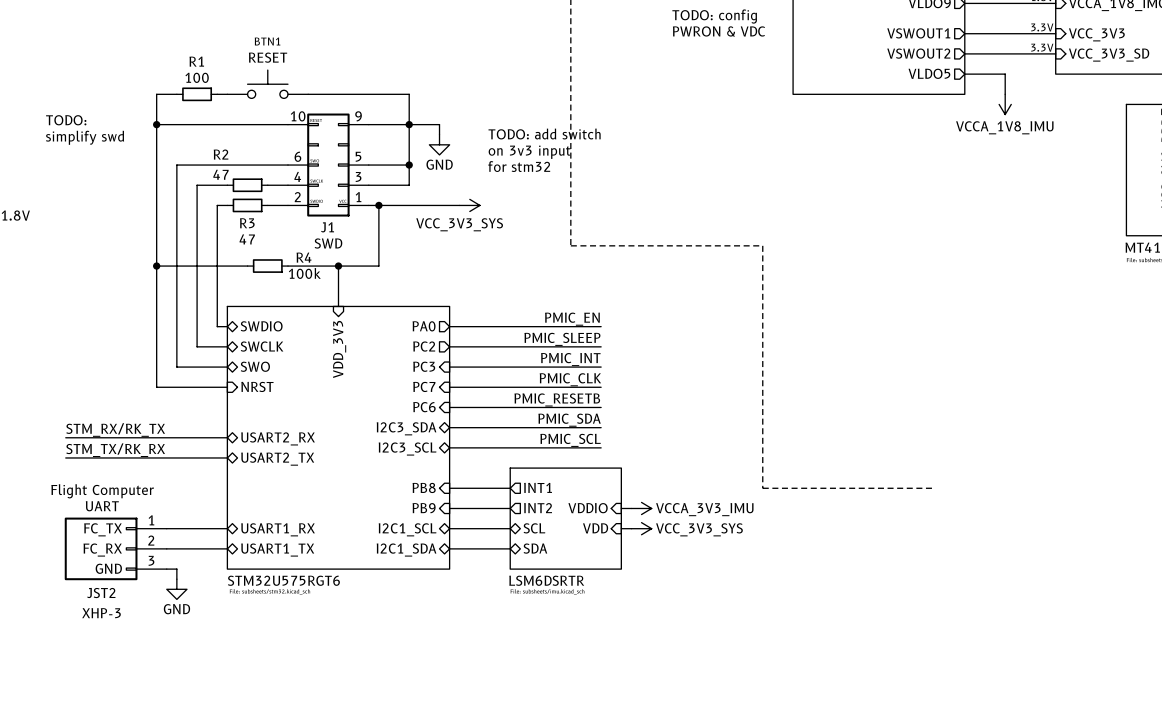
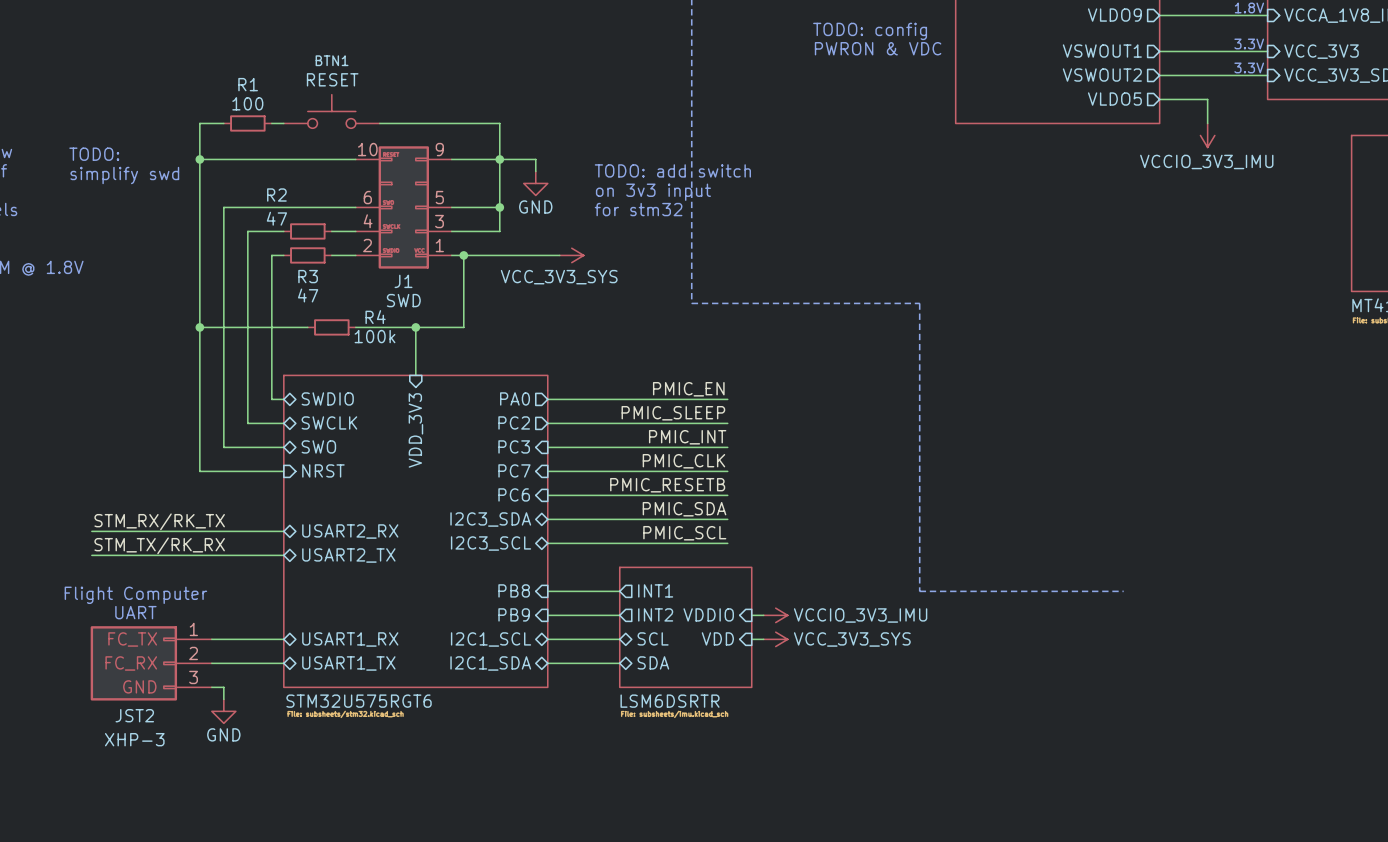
power symbol: VCCA_1V8_IMU (1005, 104) -> VCCIO_3V3_IMU (1207, 135)
power symbol: VCCA_3V3_IMU (641, 508) -> VCCIO_3V3_IMU (775, 615)

